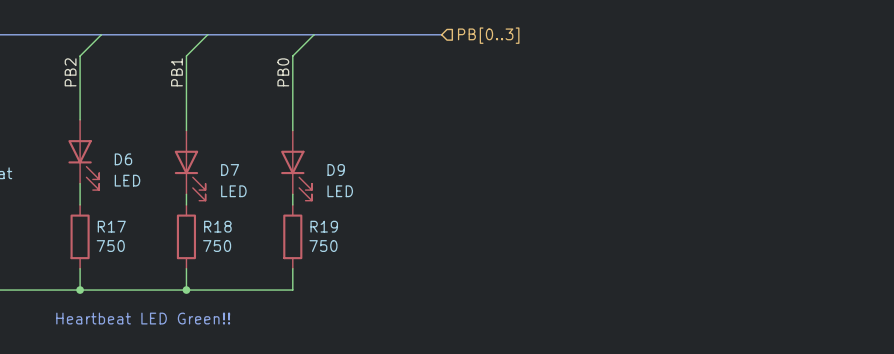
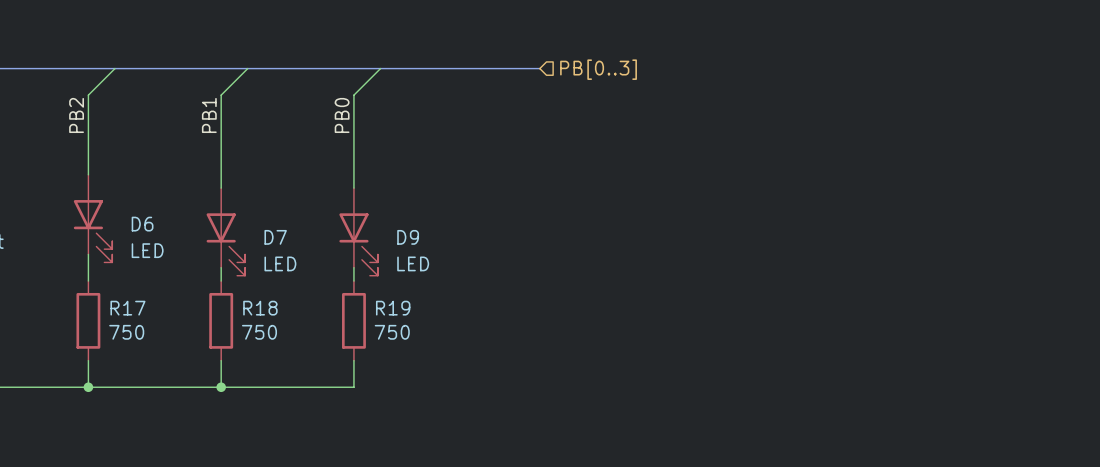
text: Heartbeat LED Green!! (143, 318) -> none

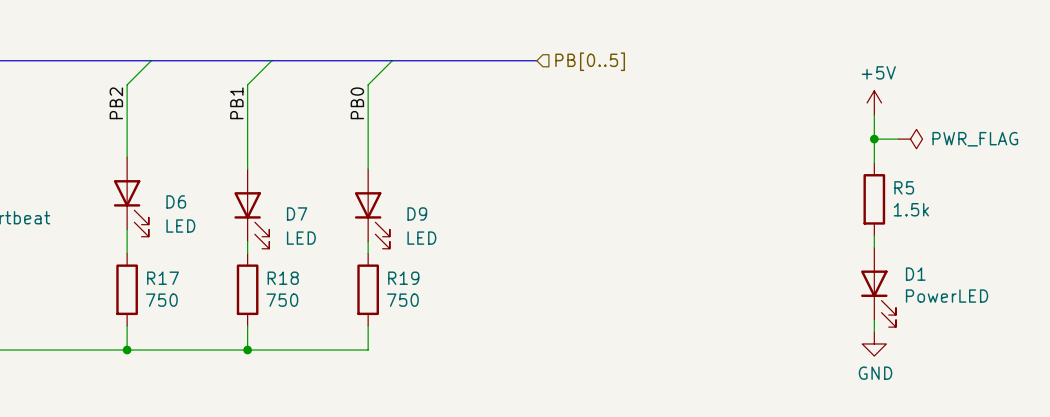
hierarchical label: PB[0..3] (598, 69) -> PB[0..5] (590, 61)
power symbol: none -> +5V (874, 102)
wire: none -> (874, 115) (874, 163)
wire: none -> (874, 139) (898, 139)
junction: none -> (874, 139)
power symbol: none -> PWR_FLAG (910, 139)
R5: none -> 1.5k (874, 199)
wire: none -> (874, 235) (874, 247)
D1: none -> PowerLED (878, 287)
wire: none -> (874, 319) (874, 331)
power symbol: none -> GND (874, 343)

